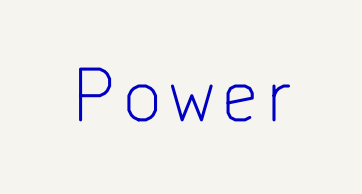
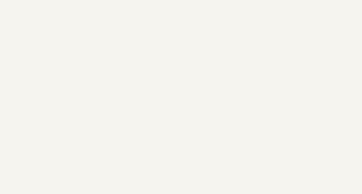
text: Power (184, 94) -> none

